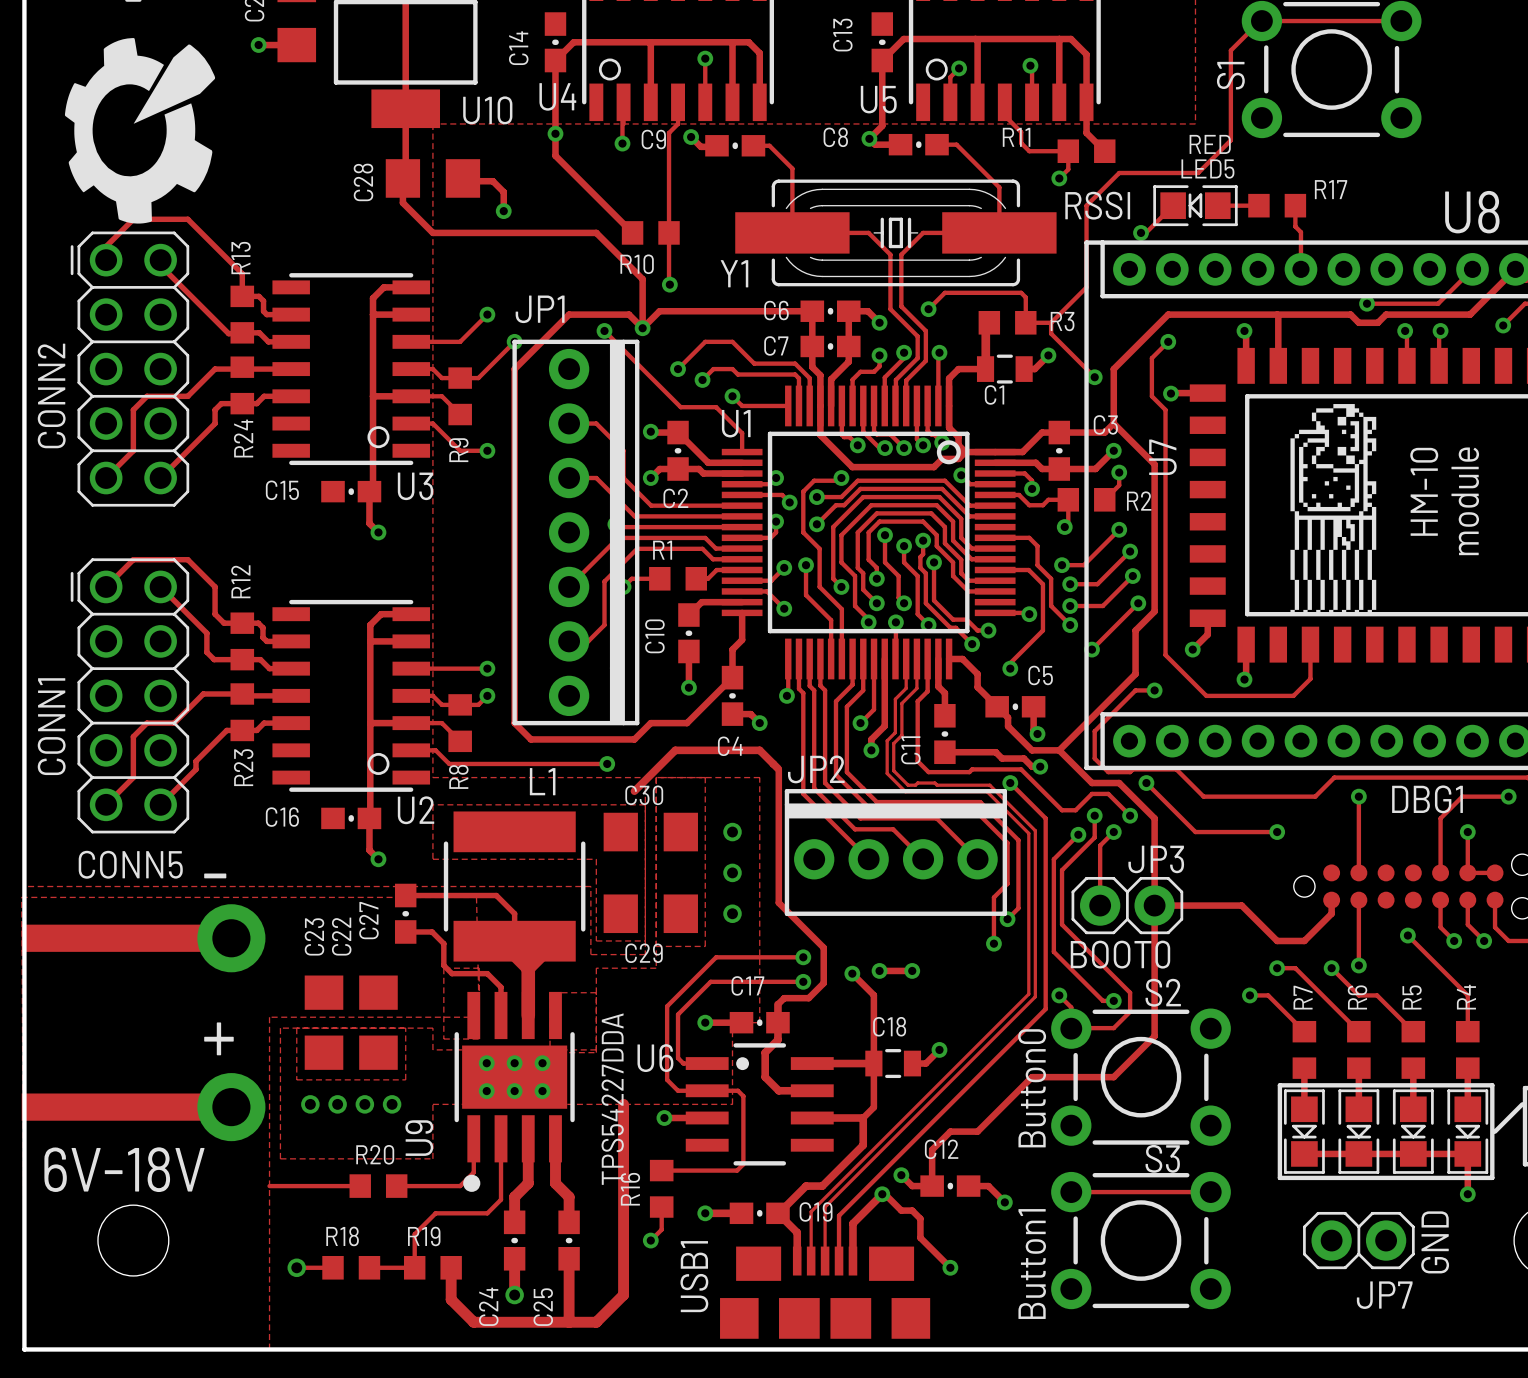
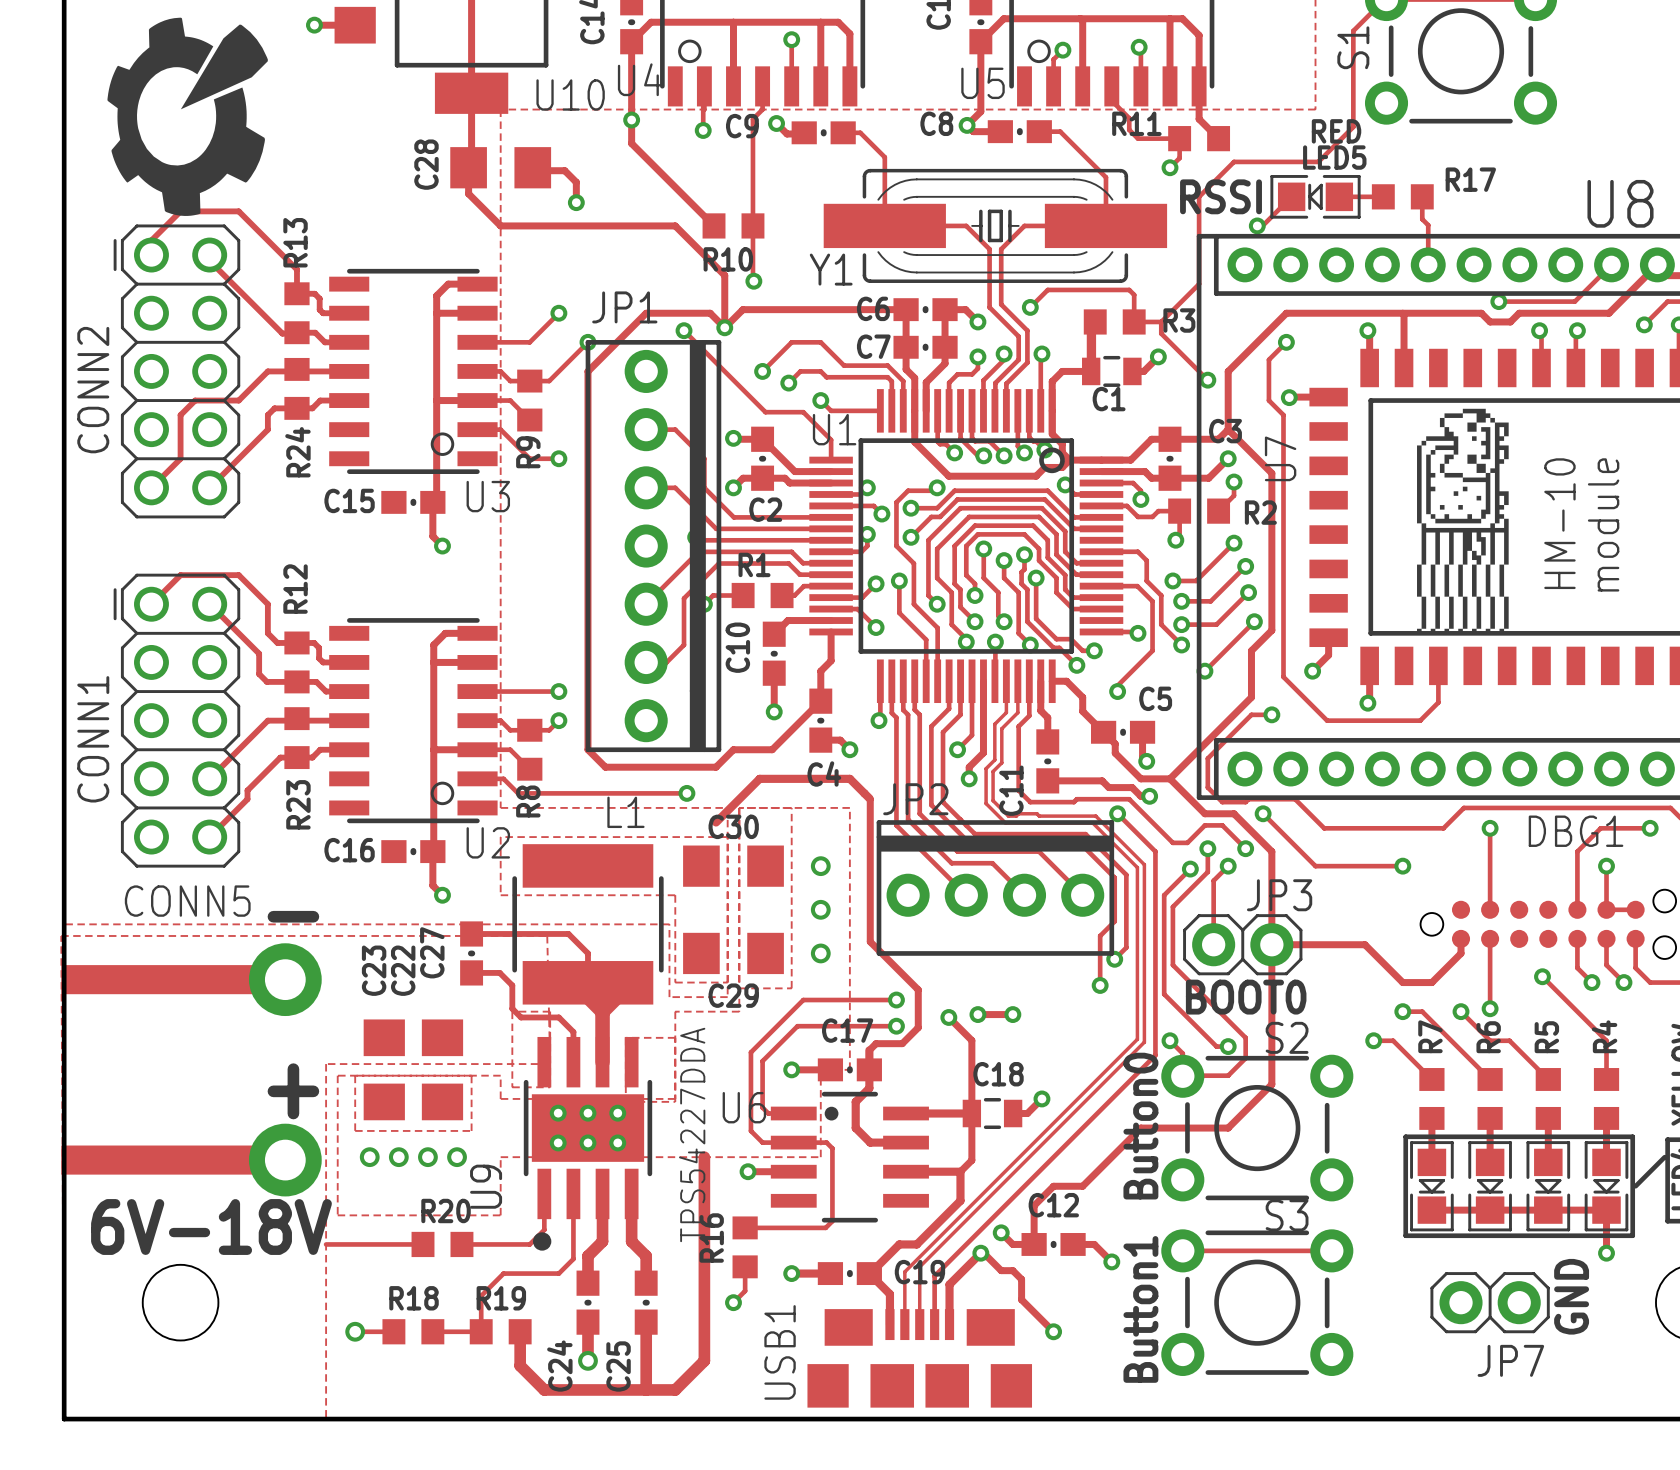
track: (242, 693) (203, 693) (174, 723) (146, 723) (133, 736) (133, 777) (106, 804) -> (296, 718) (294, 720) (267, 720) (209, 778)

